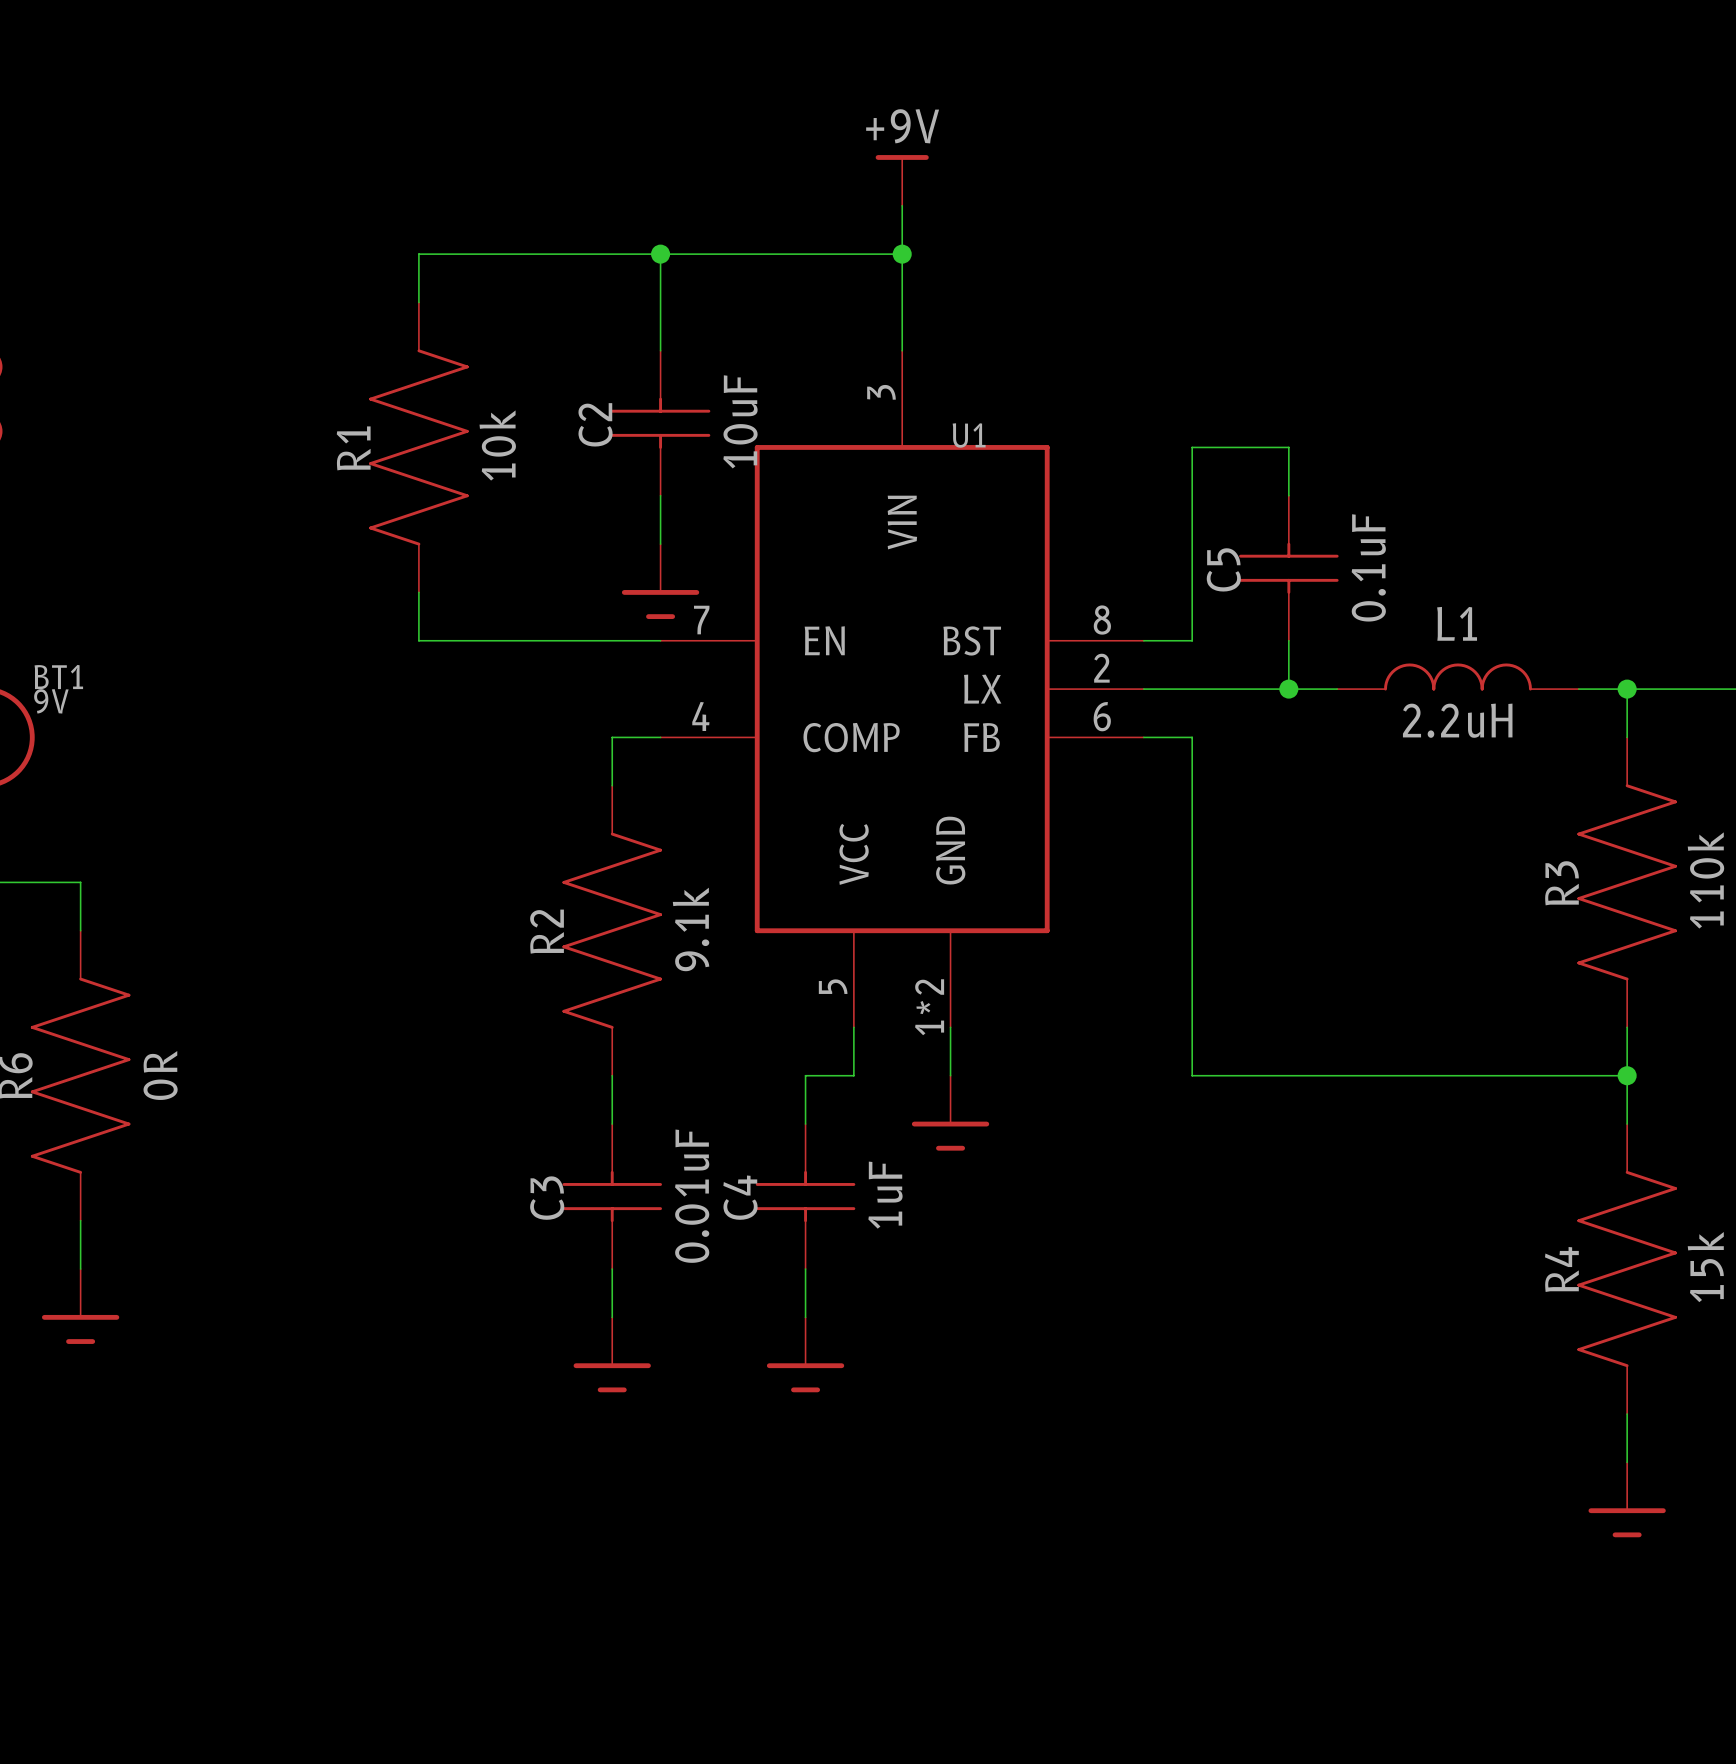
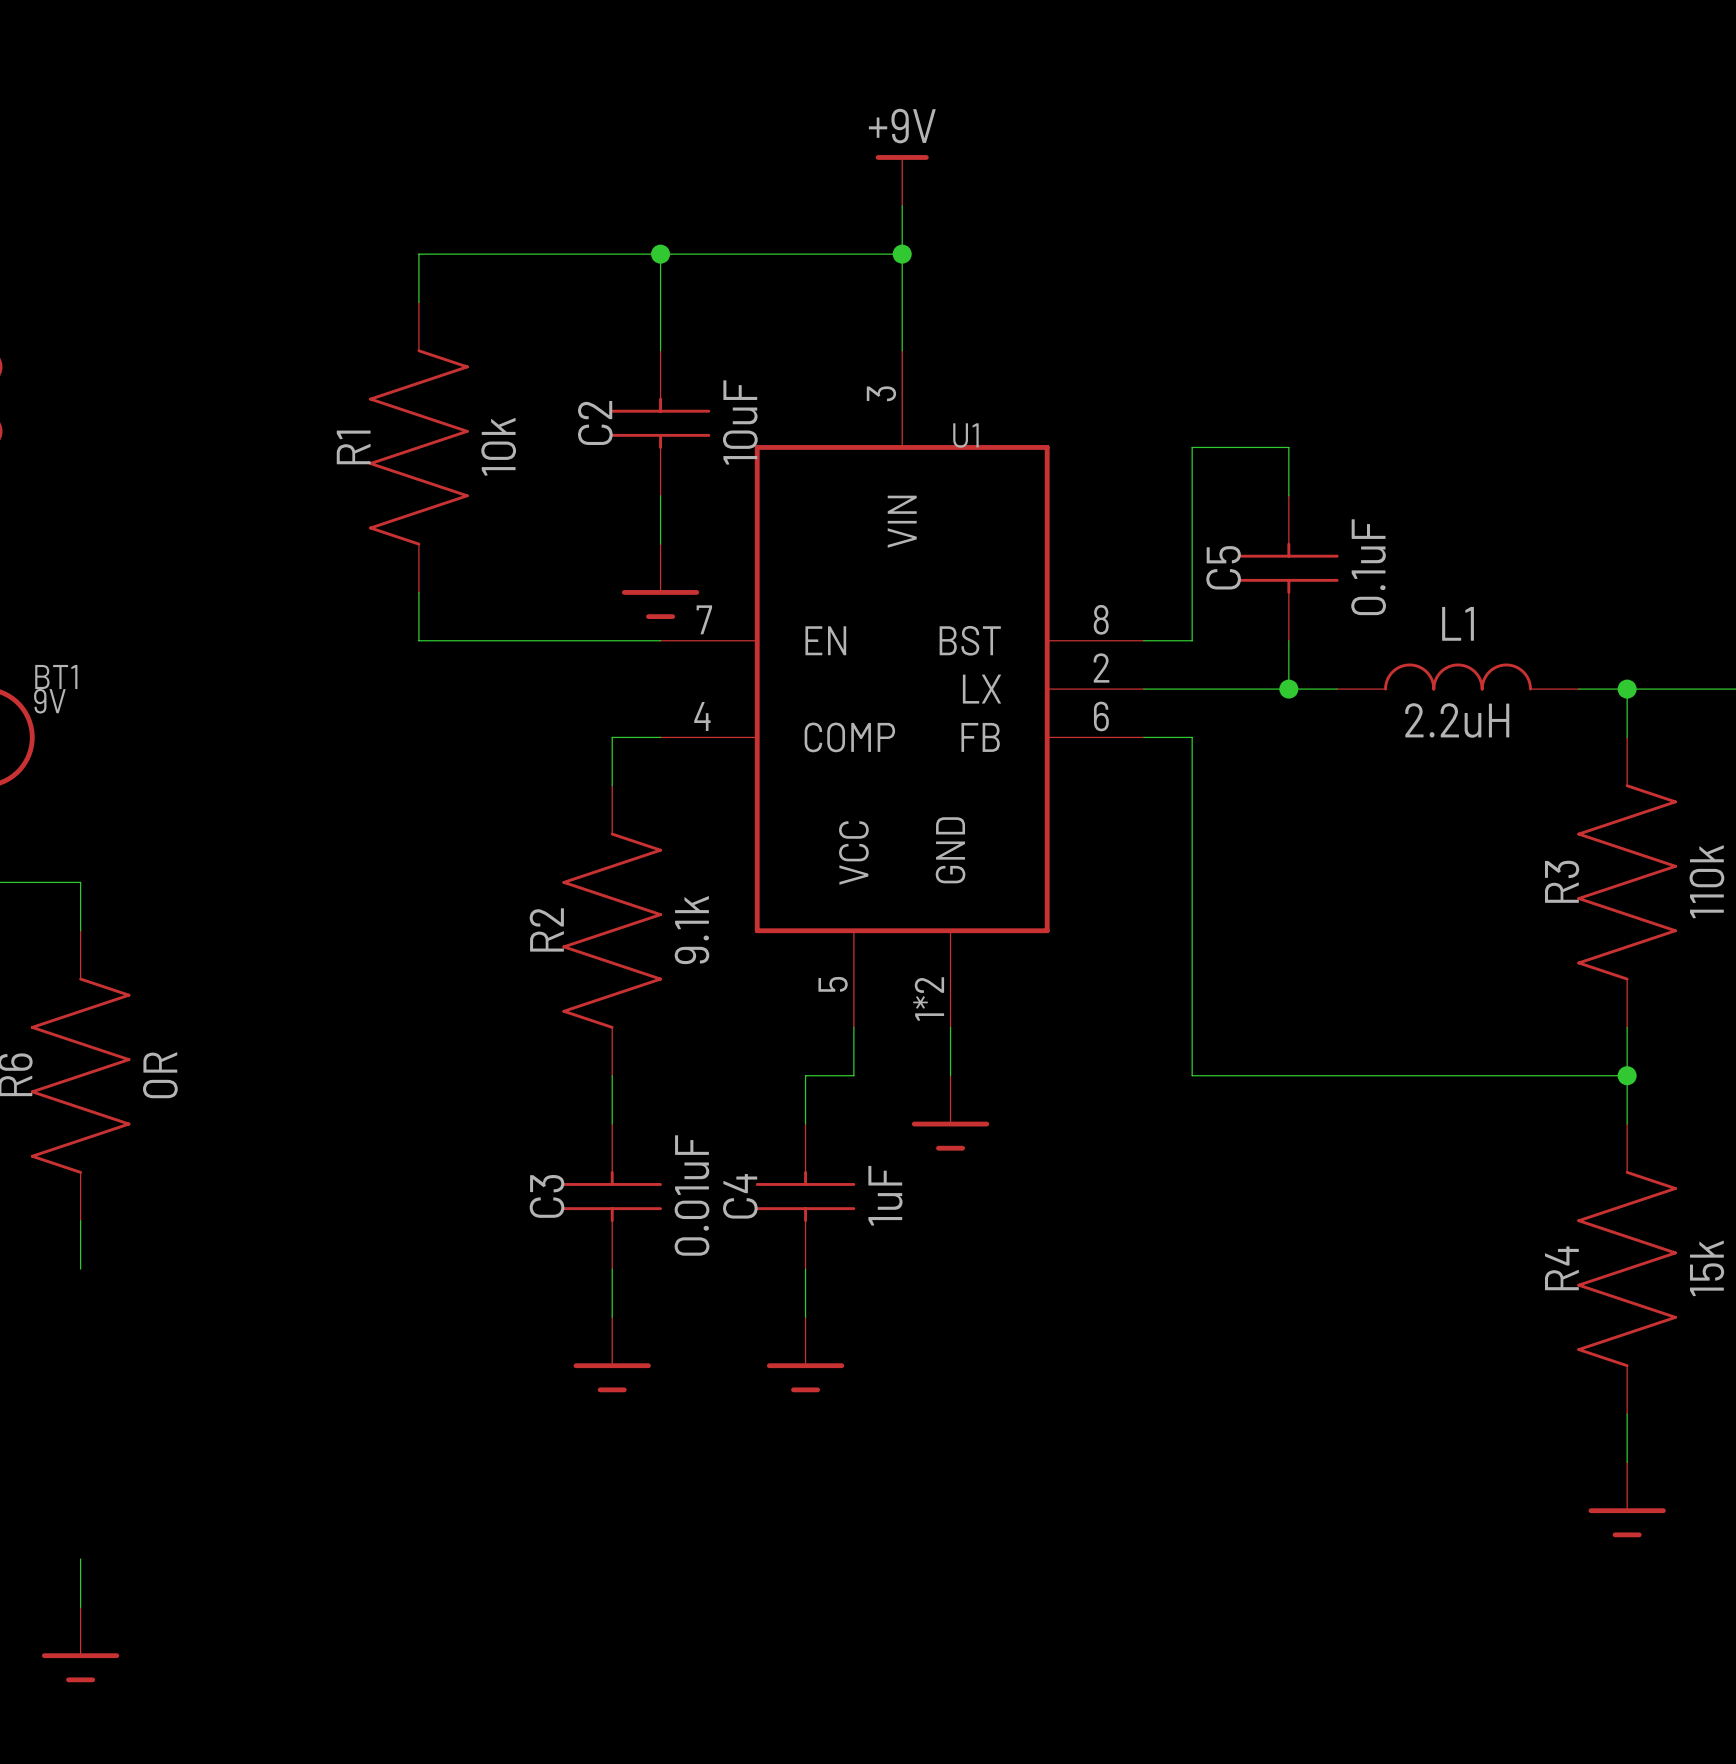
power symbol: (80, 1306) -> none
wire: none -> (80, 1559) (80, 1607)
power symbol: none -> (80, 1644)

